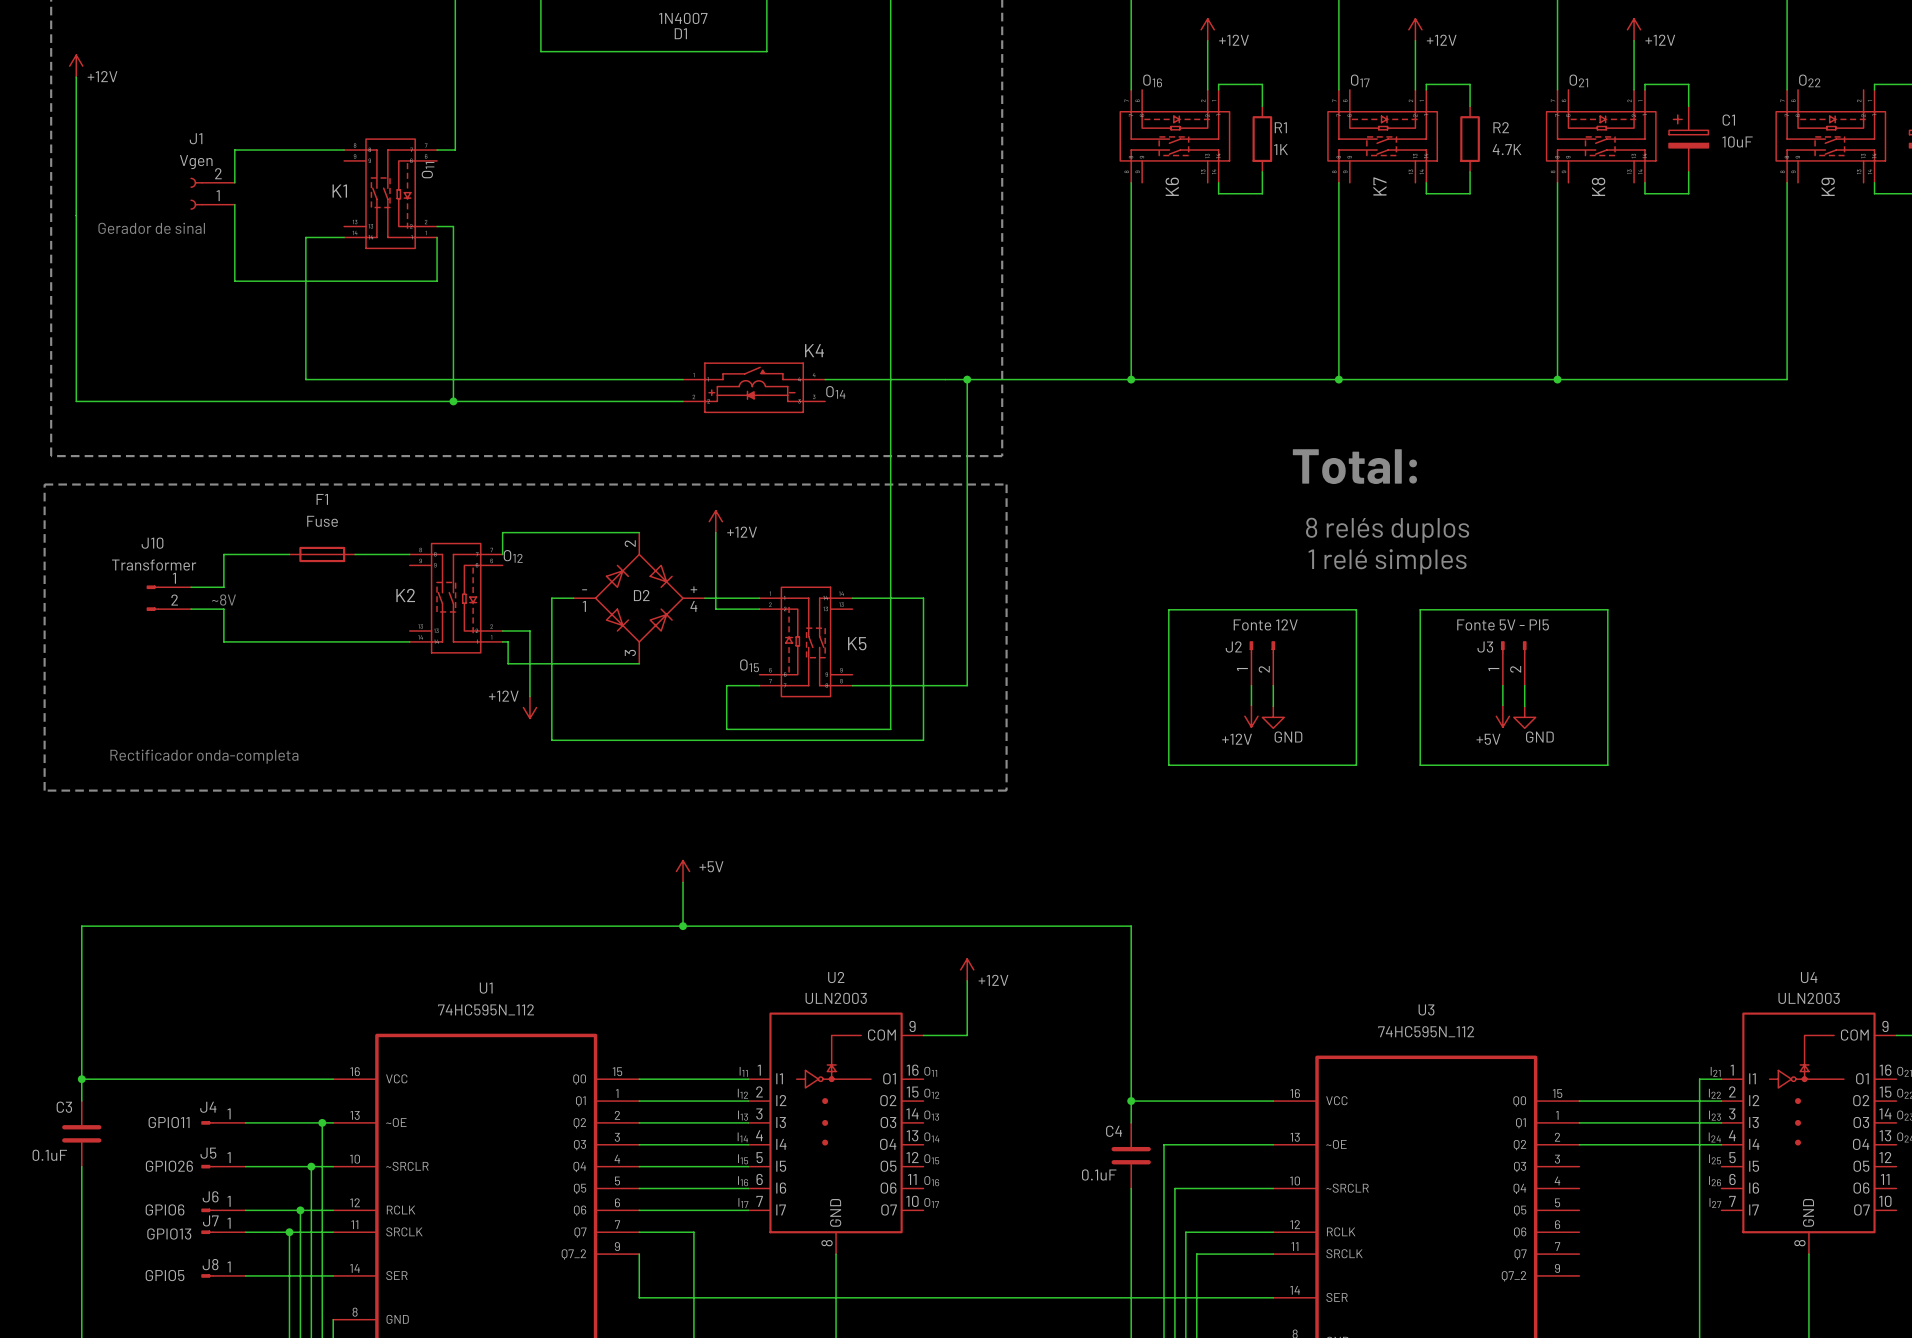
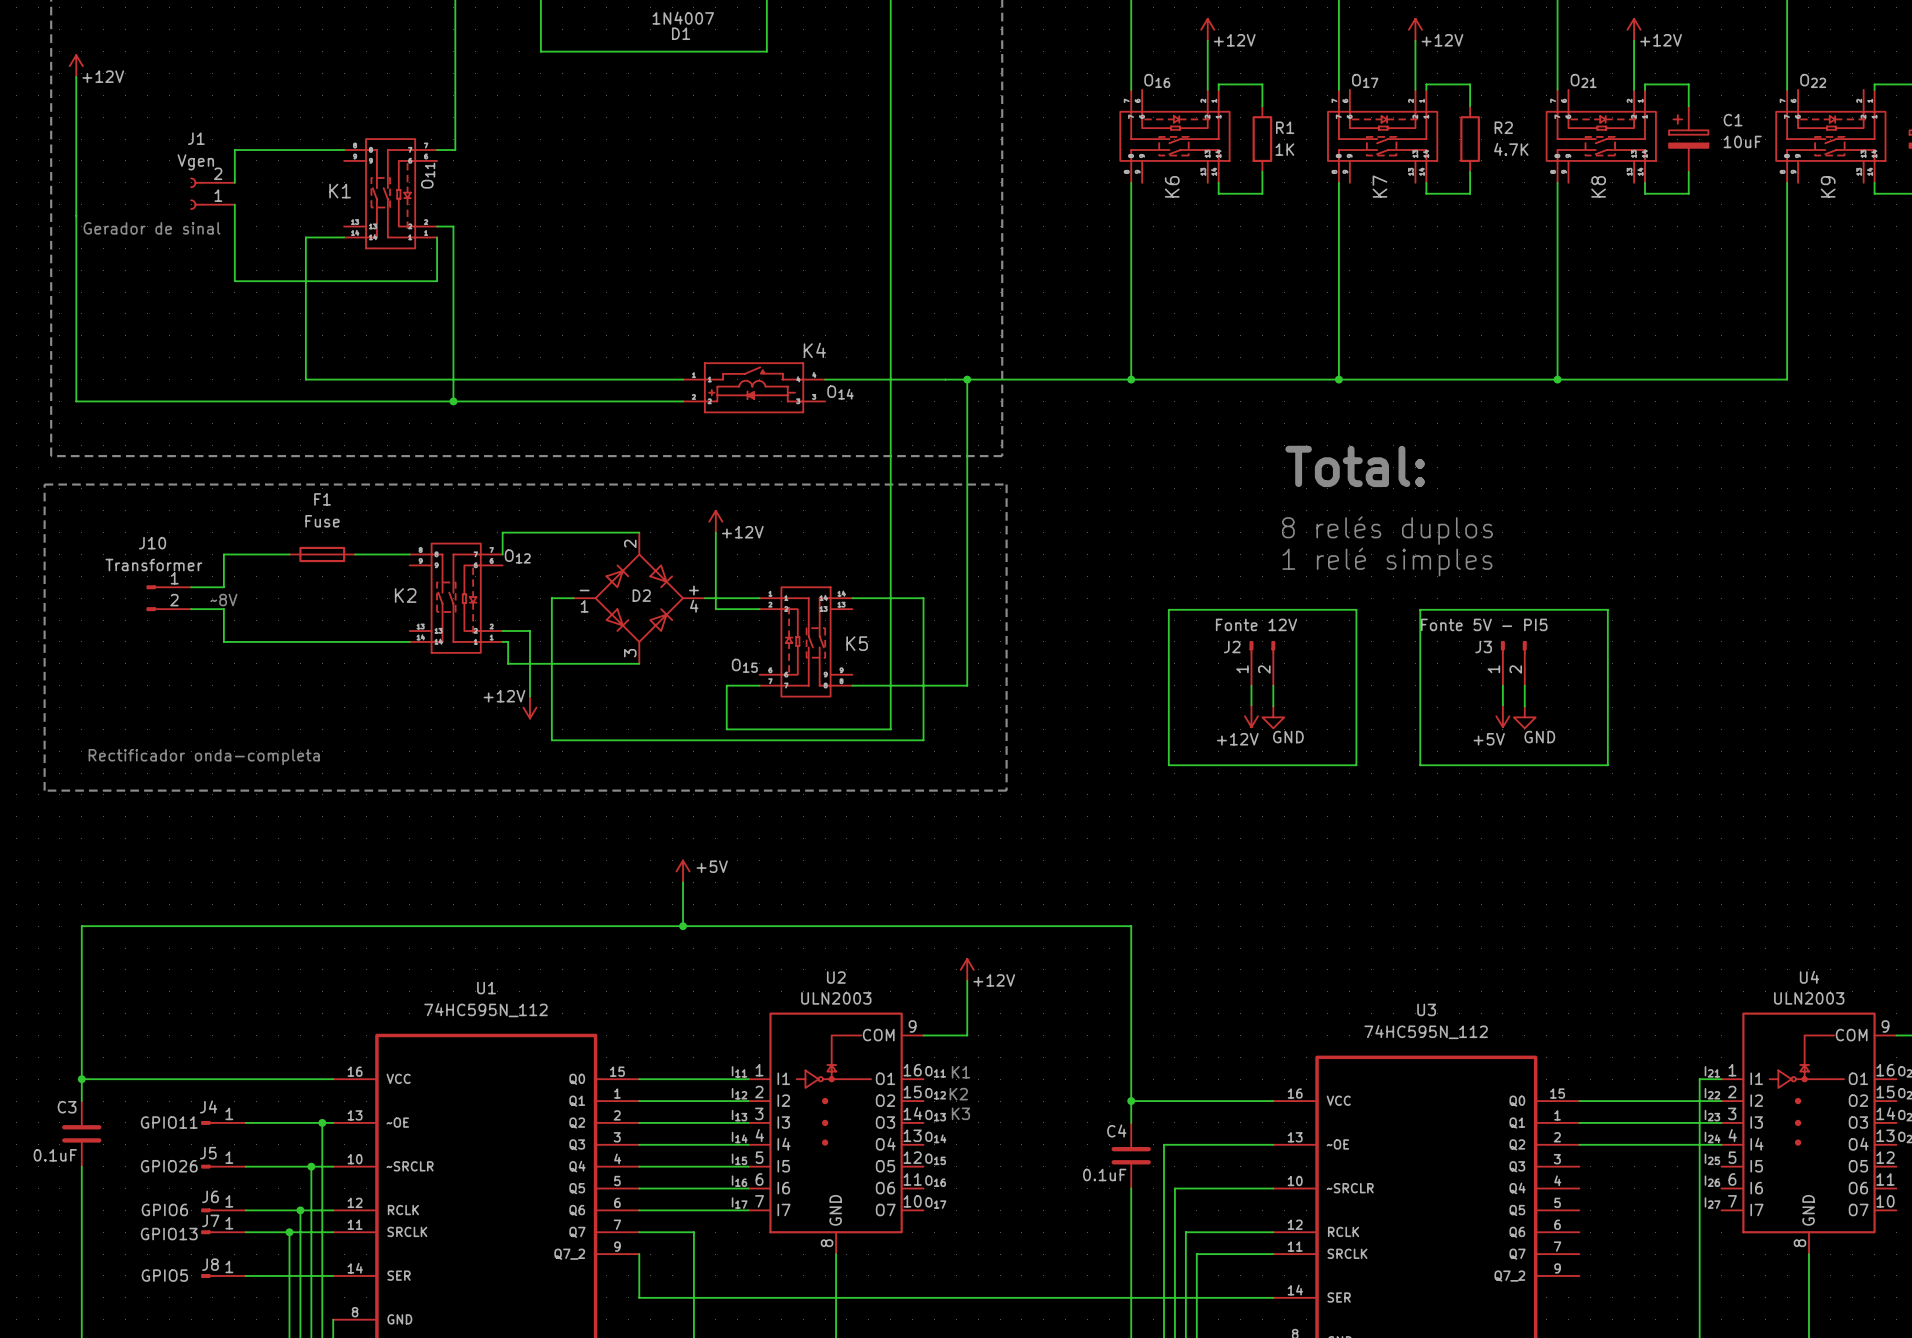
text: none -> K1 (960, 1072)
text: none -> K2 (958, 1094)
text: none -> K3 (960, 1113)

